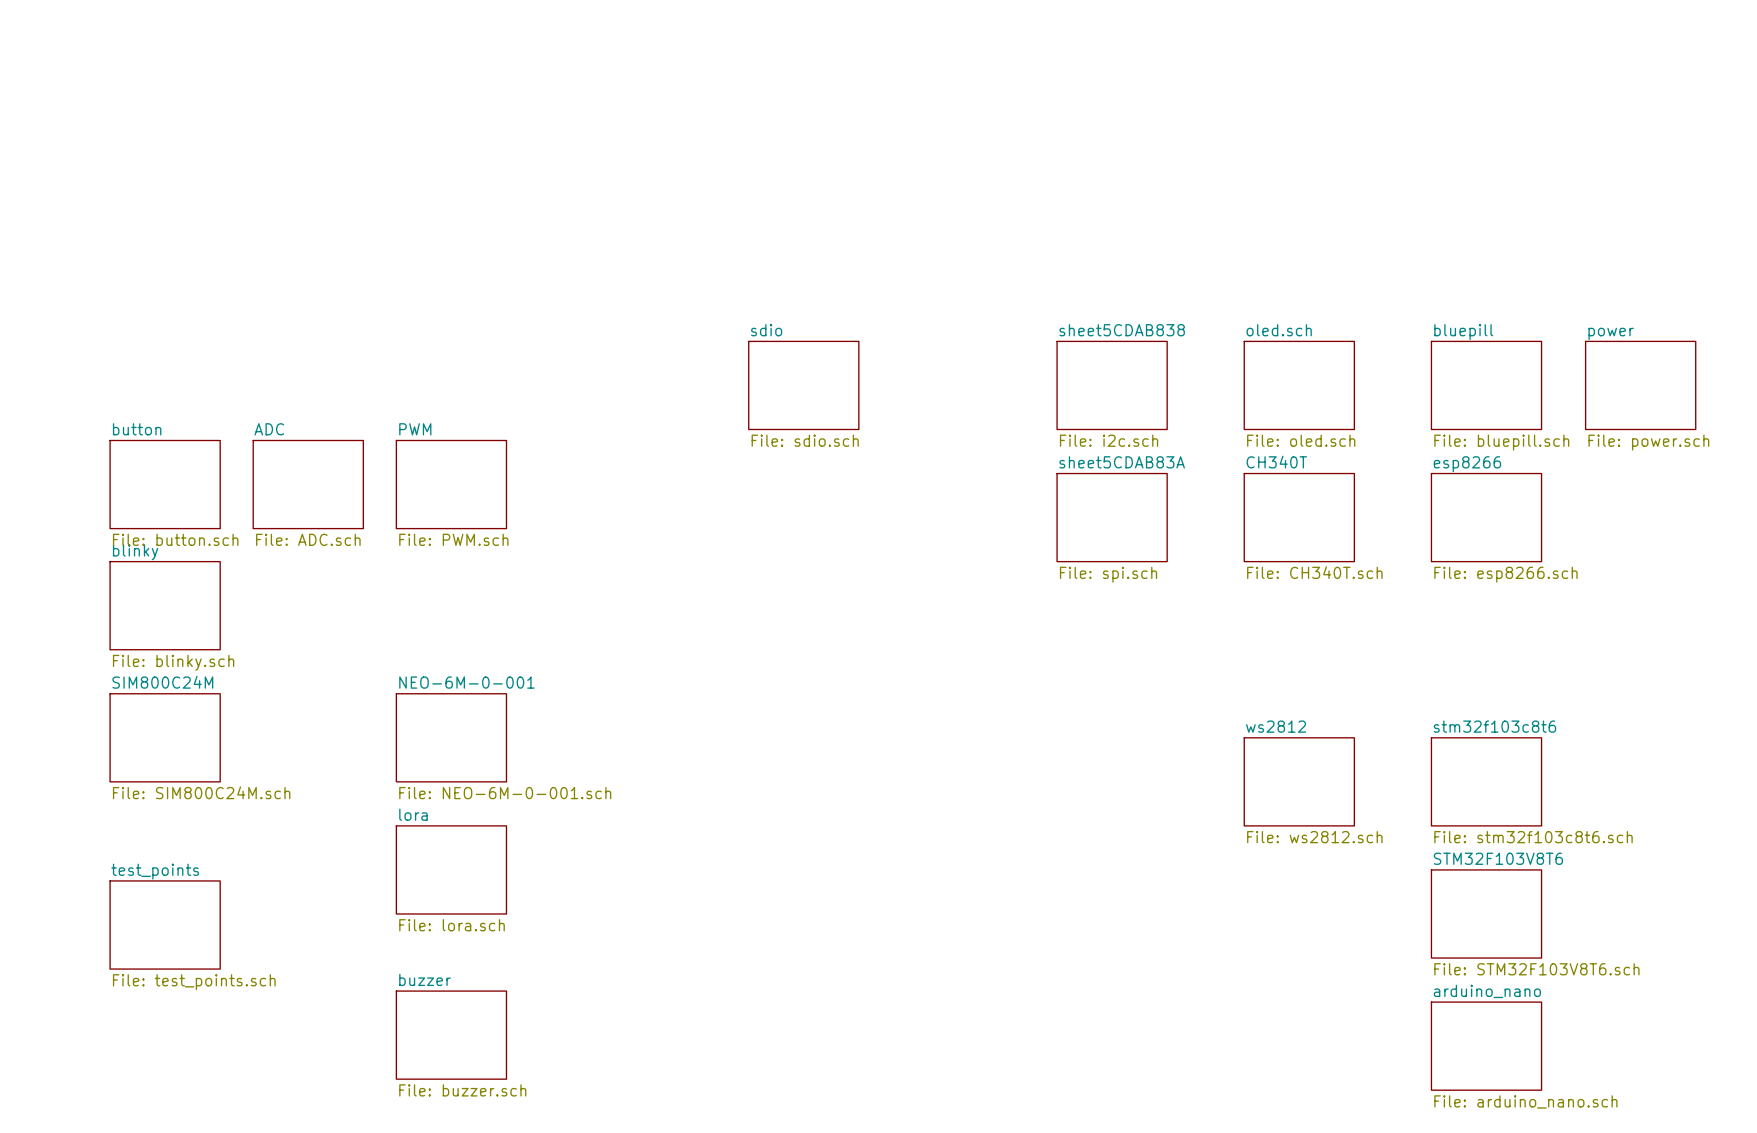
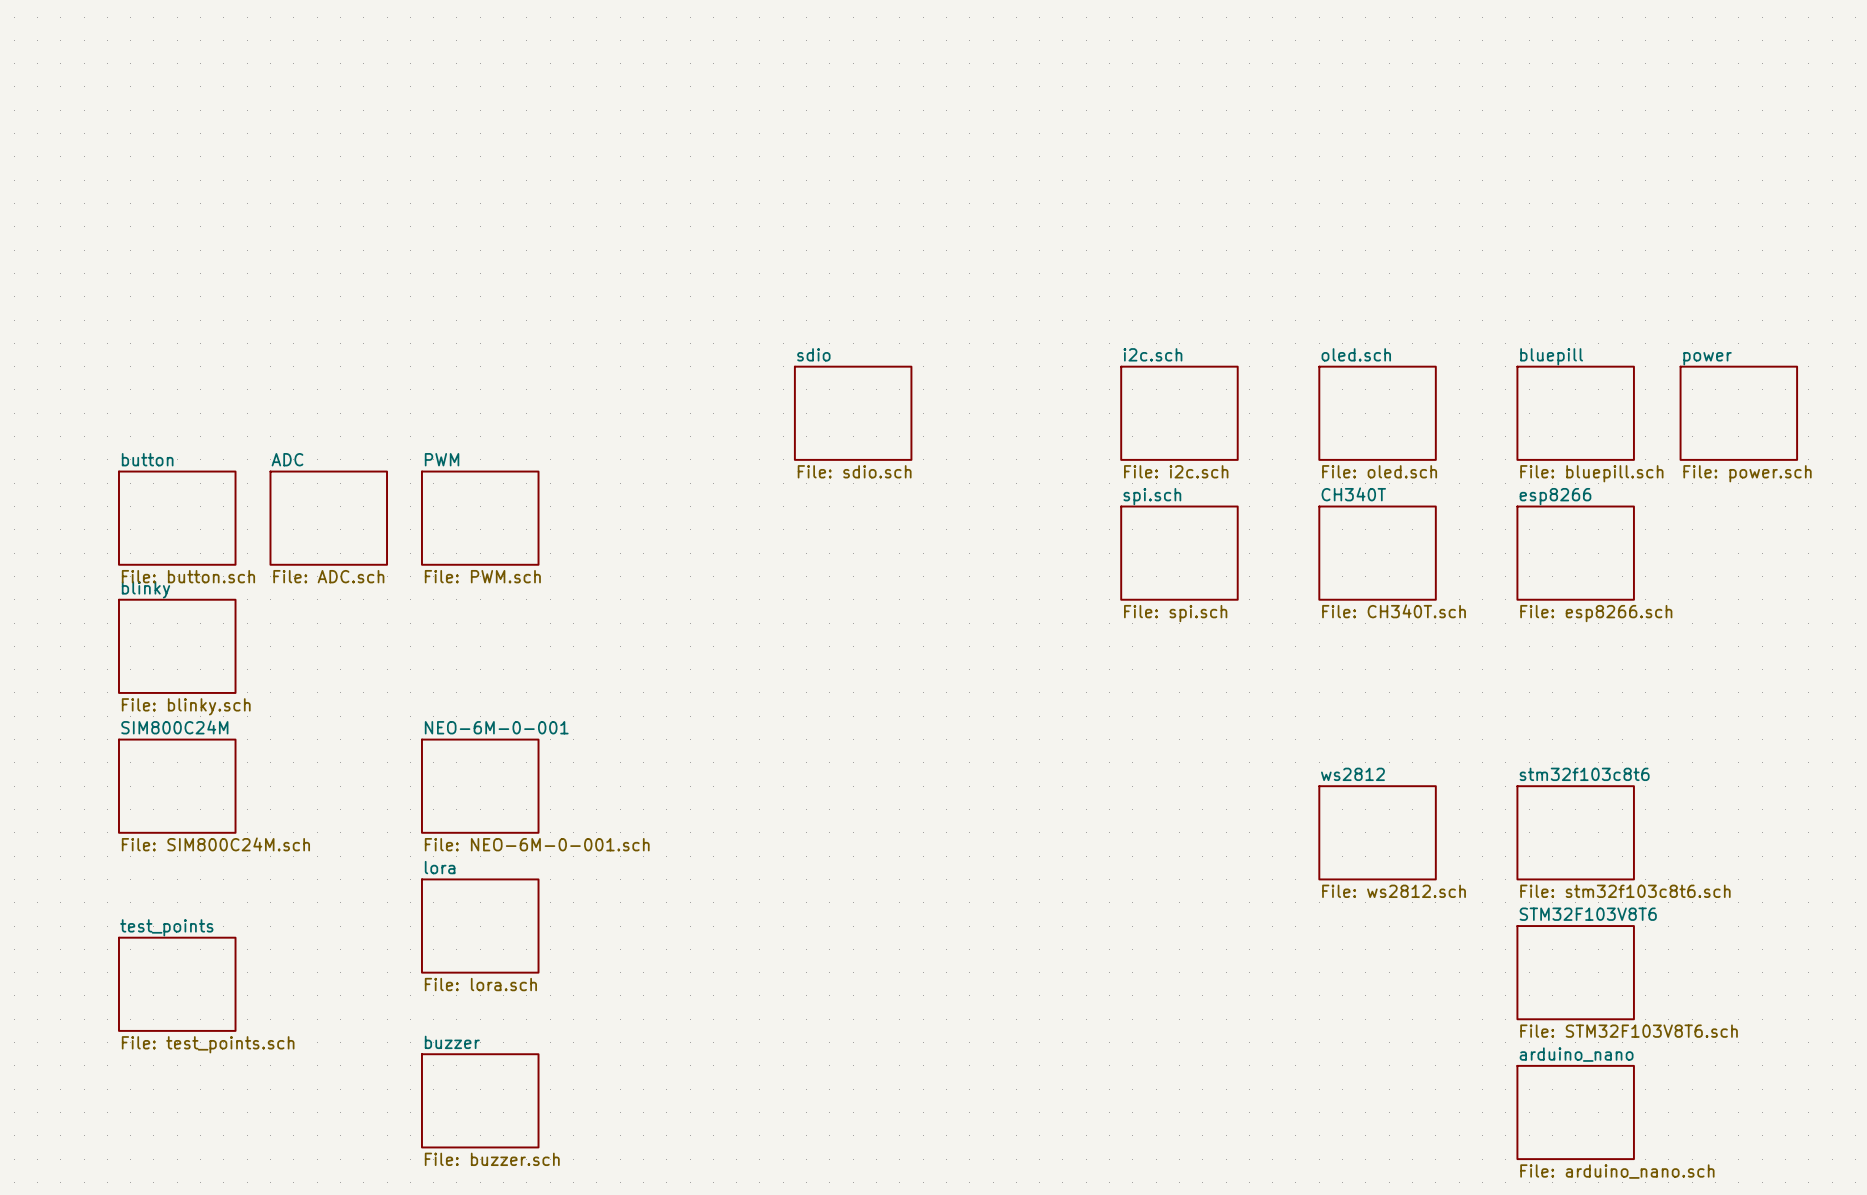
sheet sheet5CDAB838 name: sheet5CDAB838 (1122, 330) -> i2c.sch (1152, 354)
sheet sheet5CDAB83A name: sheet5CDAB83A (1122, 462) -> spi.sch (1152, 496)

